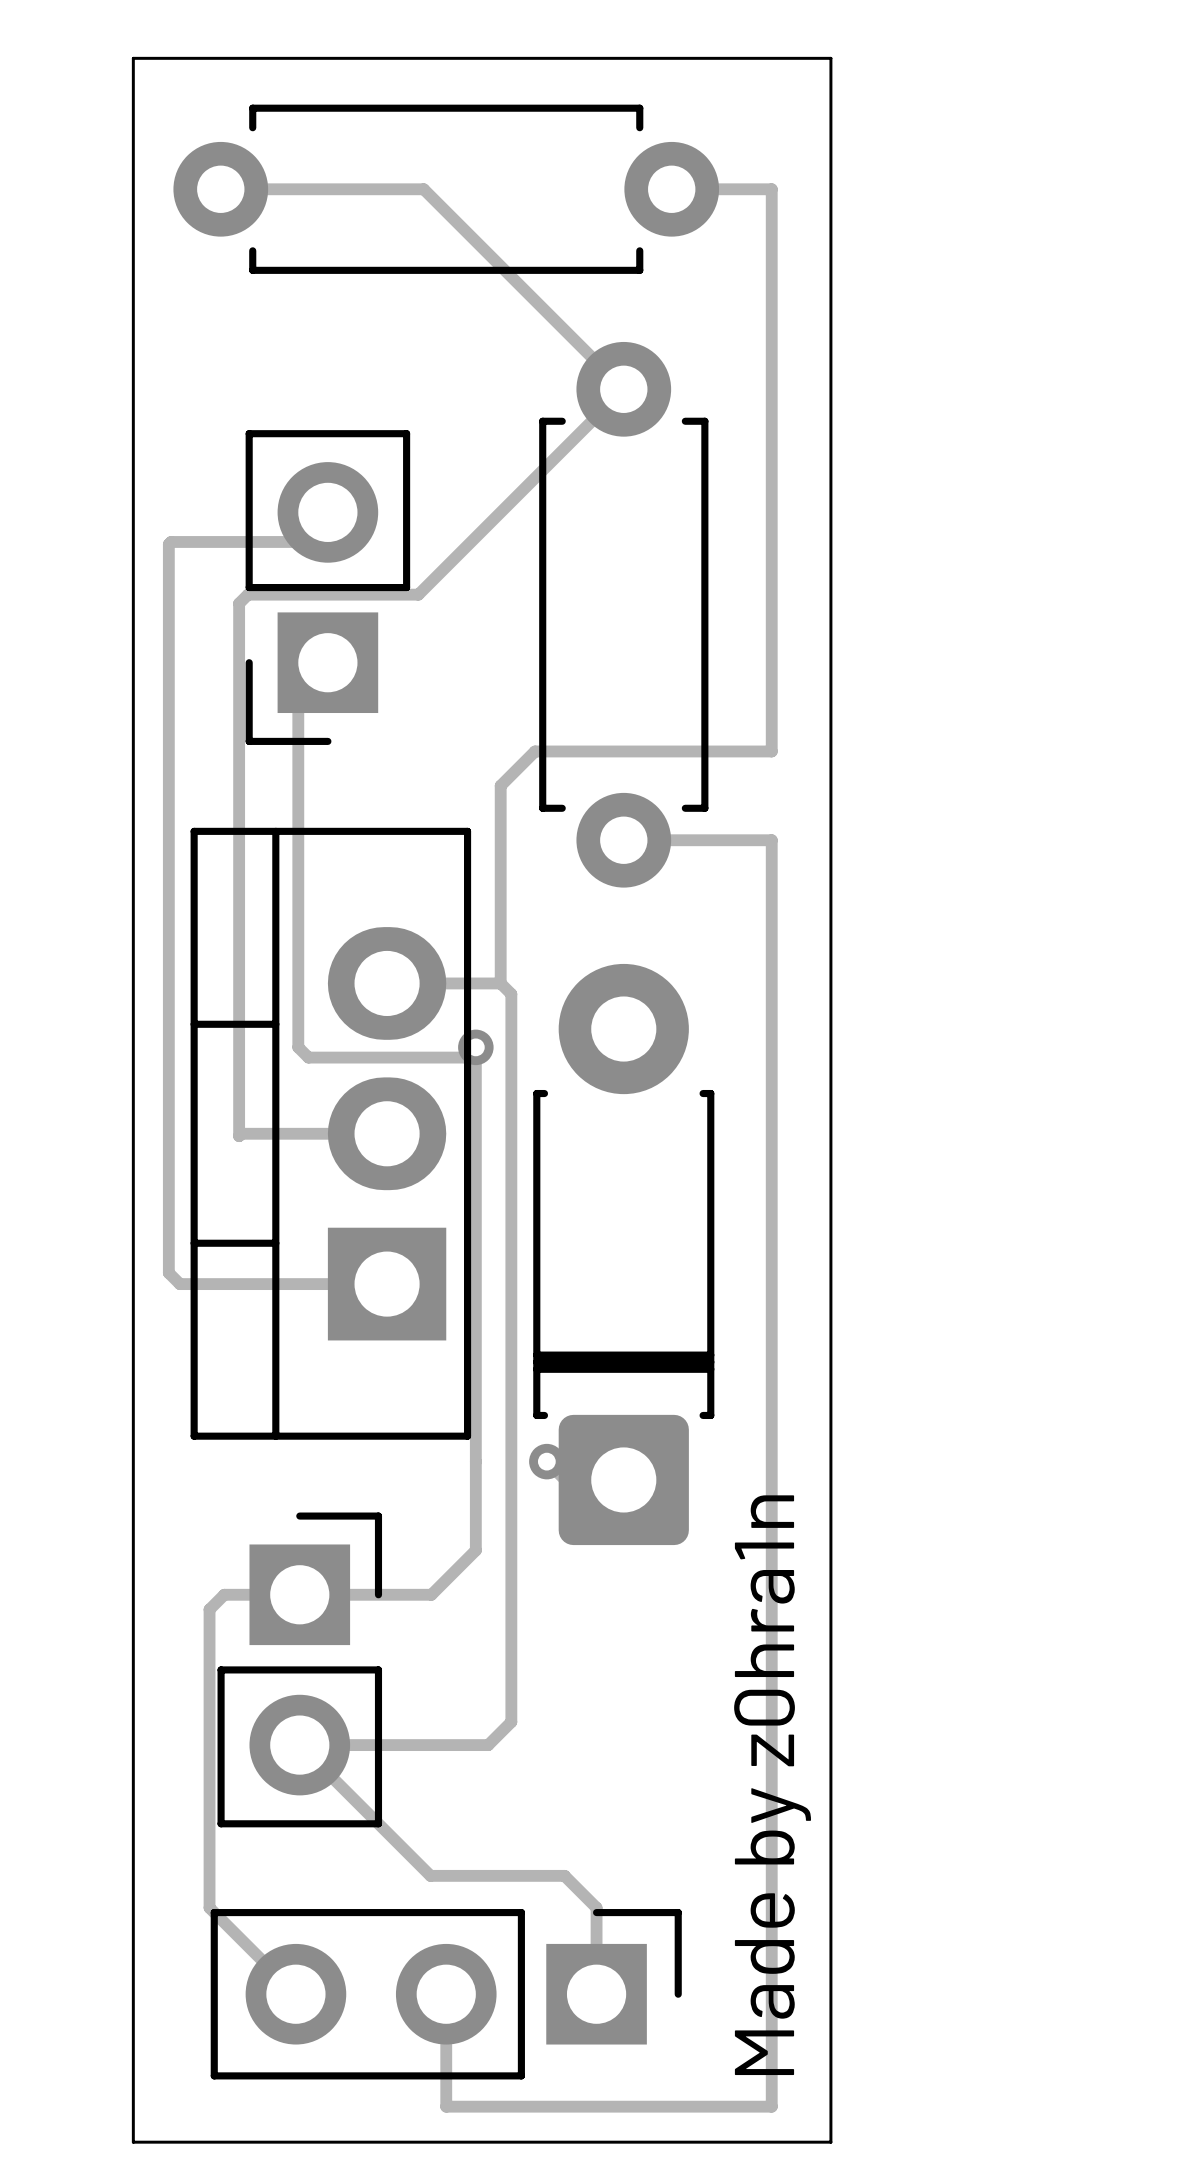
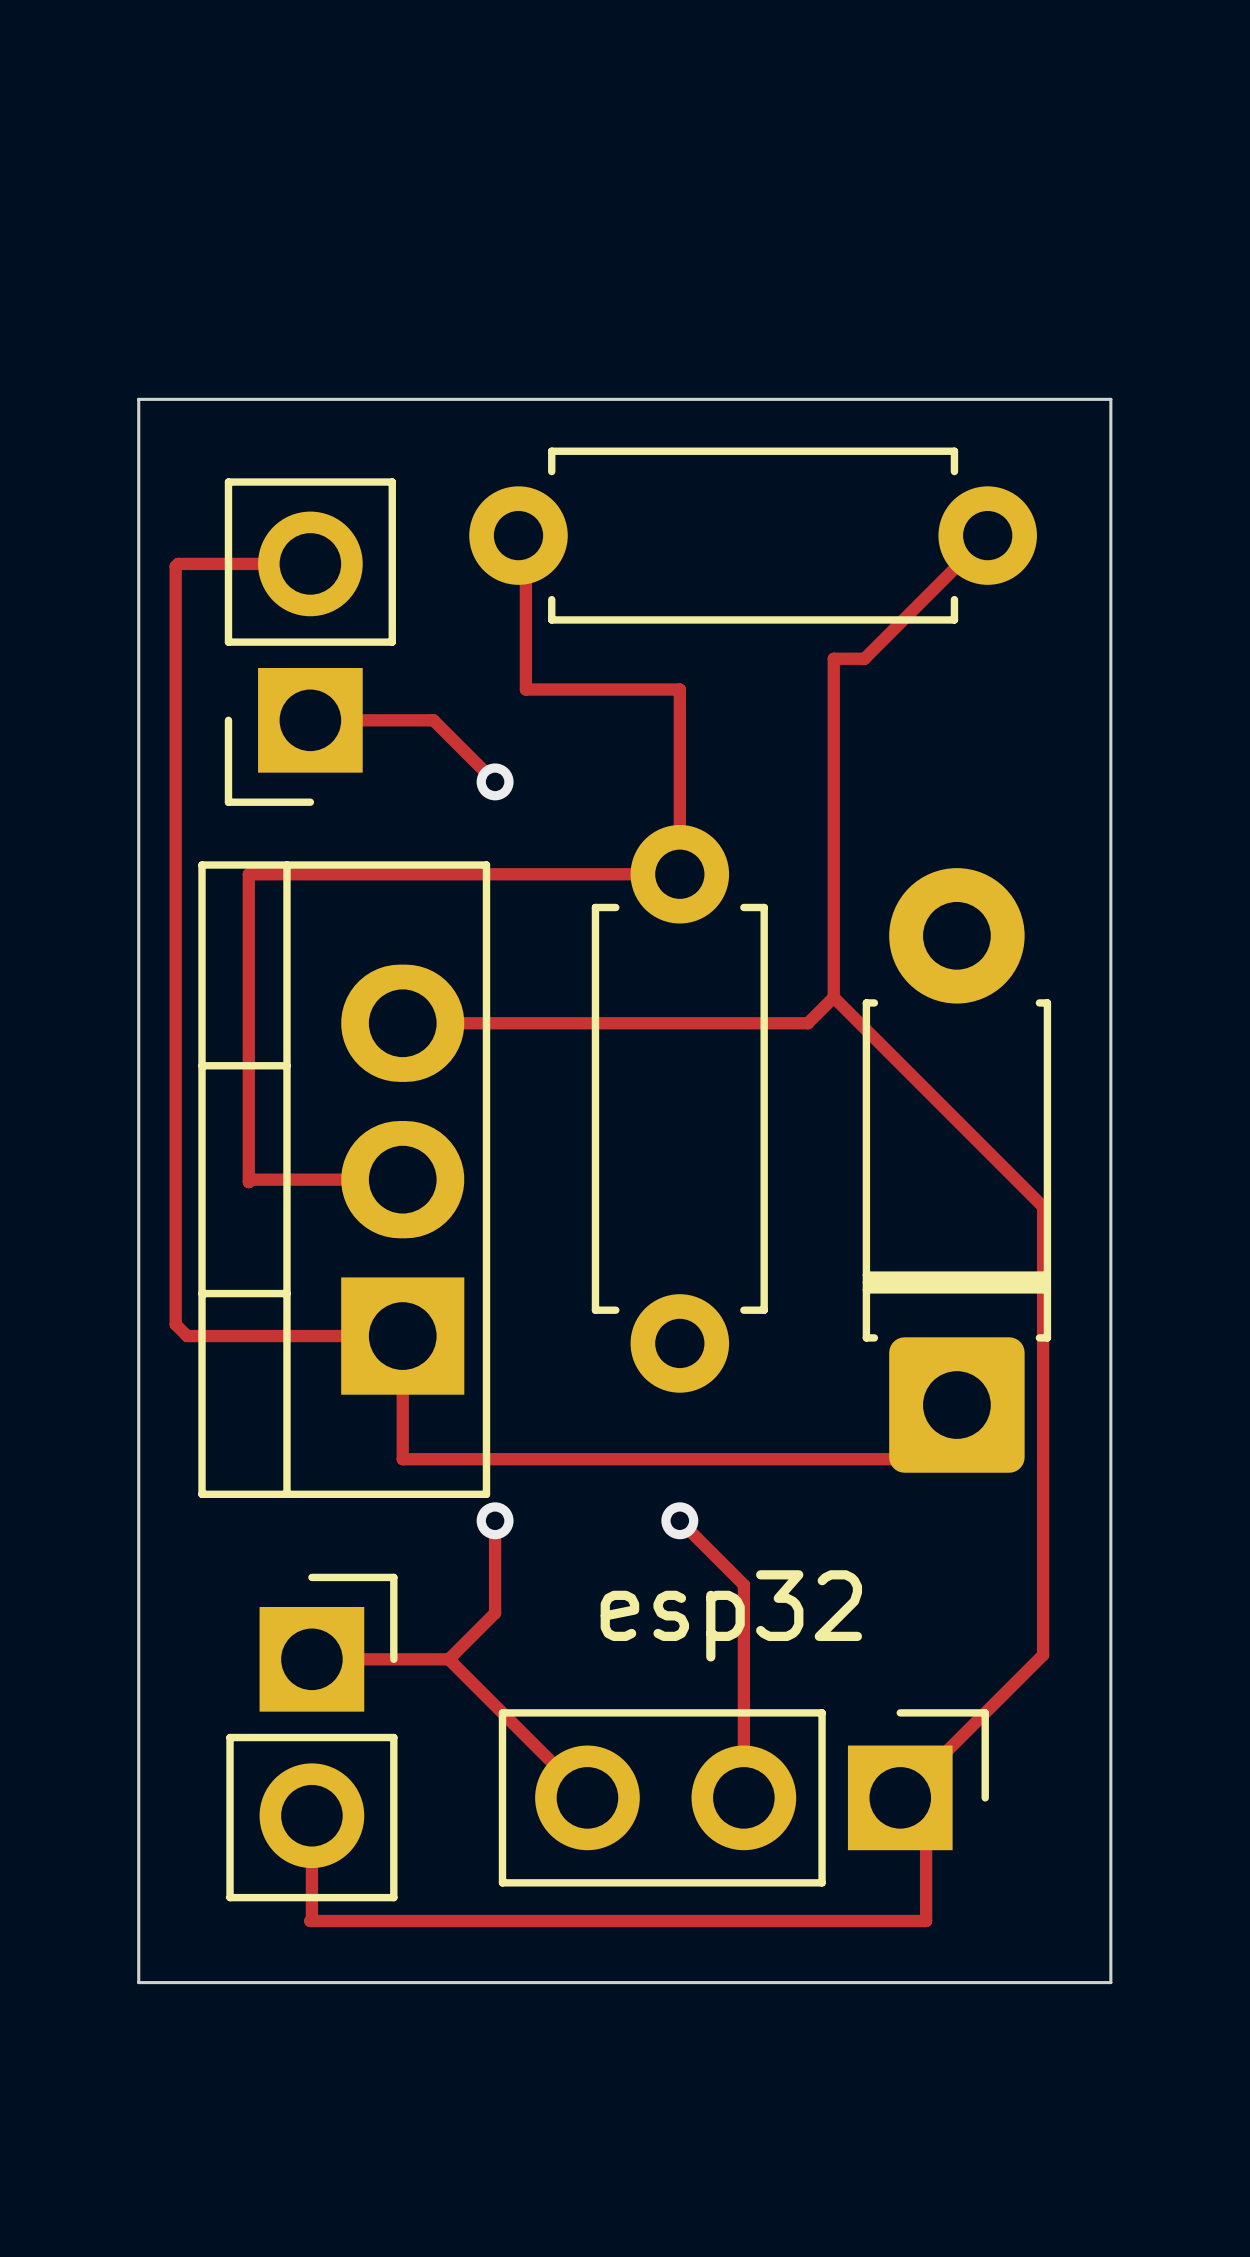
track: (220, 189) (423, 189) (623, 389) (418, 594) (248, 594) (239, 603) (239, 840) -> (649, 874) (248, 874)
part: (446, 189) -> none
track: (671, 189) (771, 189) (771, 751) (535, 751) (500, 785) (500, 983) (511, 994) (511, 1722) (488, 1745) (299, 1745) (430, 1875) (564, 1875) (596, 1907) (596, 1994) -> none
board edge: (133, 383) (133, 58) (830, 58) (830, 2142) (133, 2142) (133, 1905) -> (138, 399) (1110, 399) (1110, 1982) (138, 1982)
track: none -> (987, 535) (864, 658) (833, 658) (833, 997)
part position: (327, 587) -> (310, 642)
part rotation: 0° (623, 614) -> 90° clockwise (753, 535)
track: (327, 662) (298, 692) (298, 1047) (308, 1057) (465, 1057) (475, 1047) (475, 1461) -> none
track: none -> (310, 720) (433, 720) (495, 781)
via: none -> (495, 781)
track: (653, 840) (771, 840) (771, 2106) (446, 2106) (446, 1994) -> (679, 874) (679, 689) (525, 689) (525, 535) (518, 535)
track: none -> (833, 997) (807, 1023) (520, 1023)
track: none -> (833, 997) (1043, 1206) (1043, 1655) (900, 1797) (926, 1823) (926, 1921) (310, 1921) (311, 1919) (311, 1815)
via: (475, 1047) -> none
part: none -> (679, 1108)
part position: (623, 1254) -> (956, 1170)
track: none -> (402, 1336) (402, 1459) (902, 1459) (956, 1405)
via: none -> (495, 1520)
via: (546, 1461) -> none
track: none -> (679, 1520) (743, 1584) (743, 1797)
via: none -> (679, 1520)
text: none -> esp32 (731, 1615)
track: (299, 1594) (224, 1594) (209, 1609) (209, 1907) (295, 1994) -> none
track: none -> (448, 1659) (587, 1797)
text: Made by z0hra1n (772, 1785) -> none
part position: (446, 1994) -> (743, 1797)

